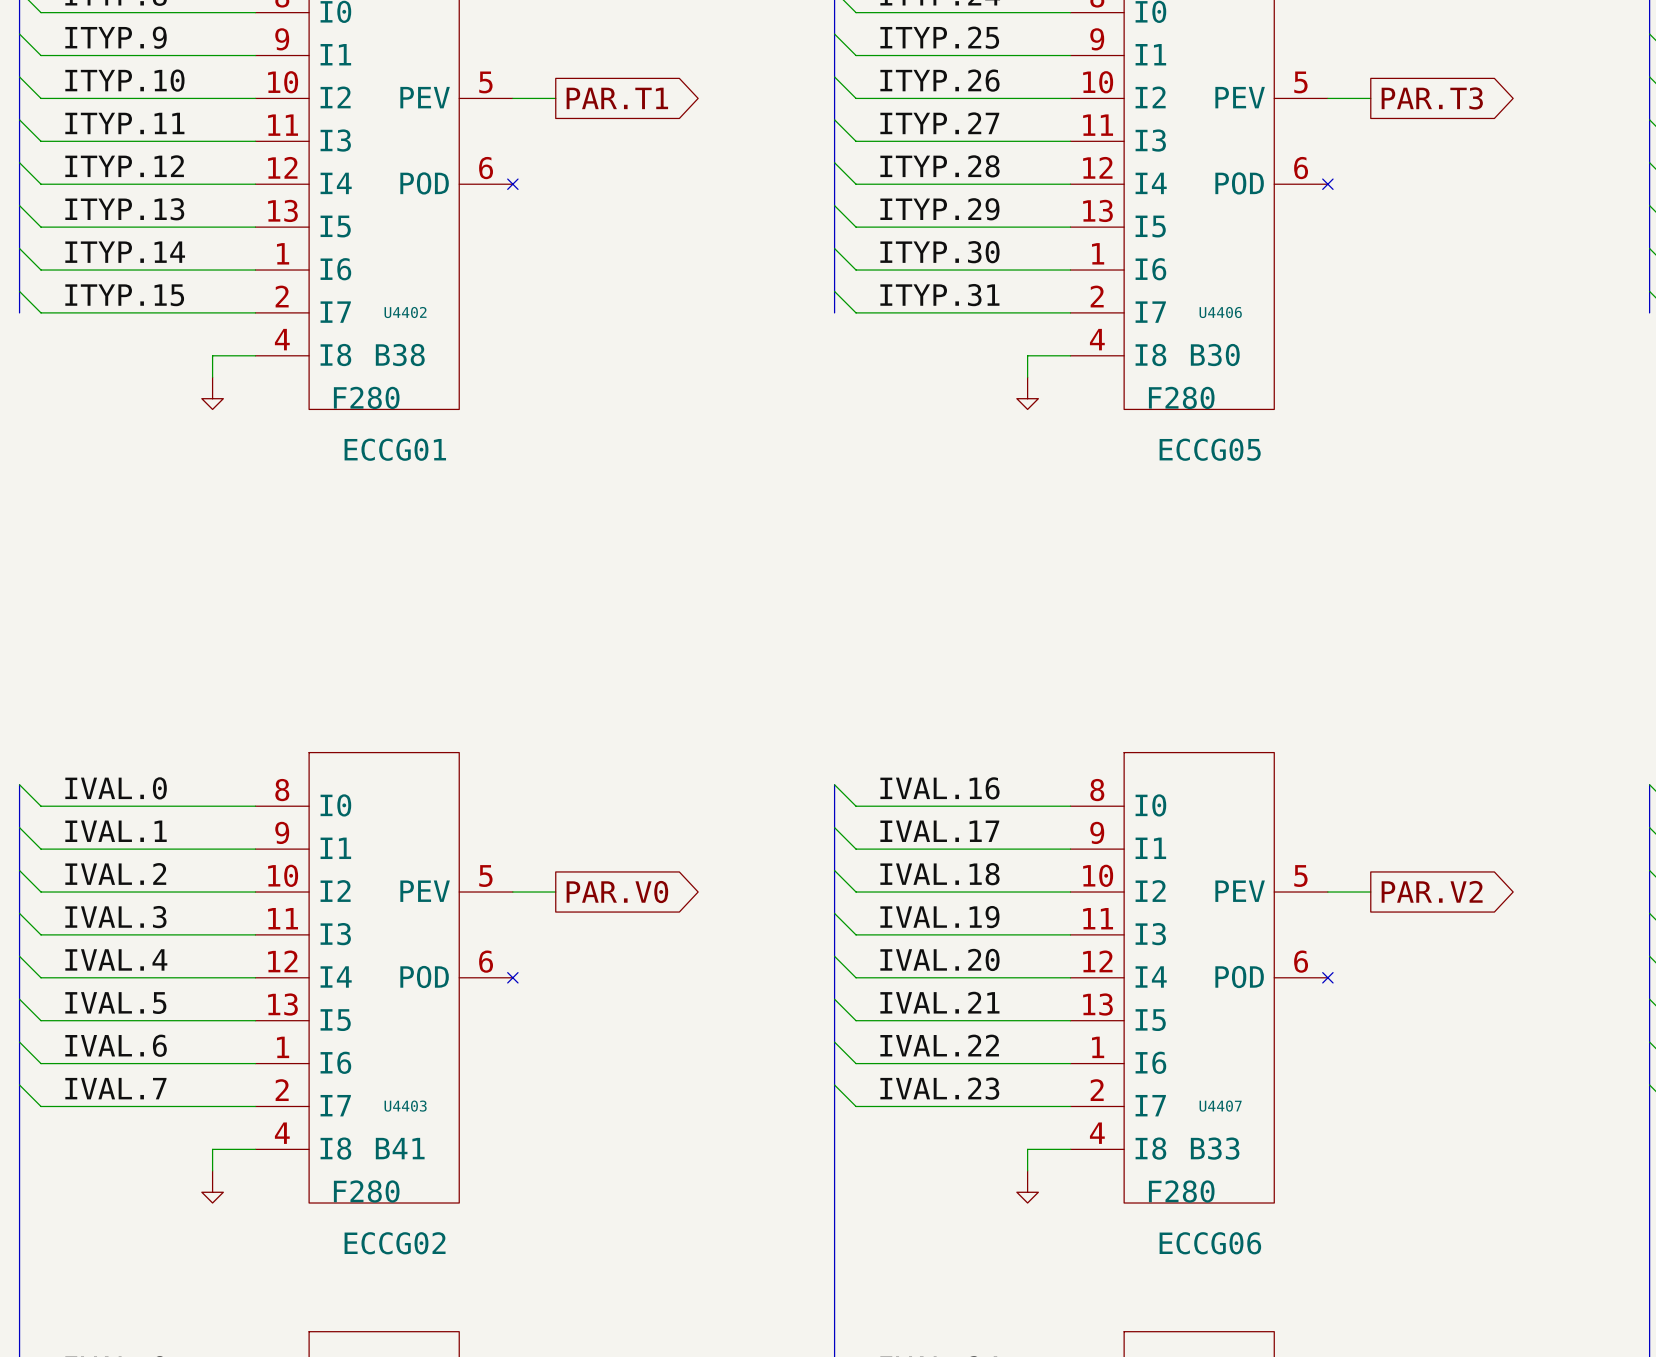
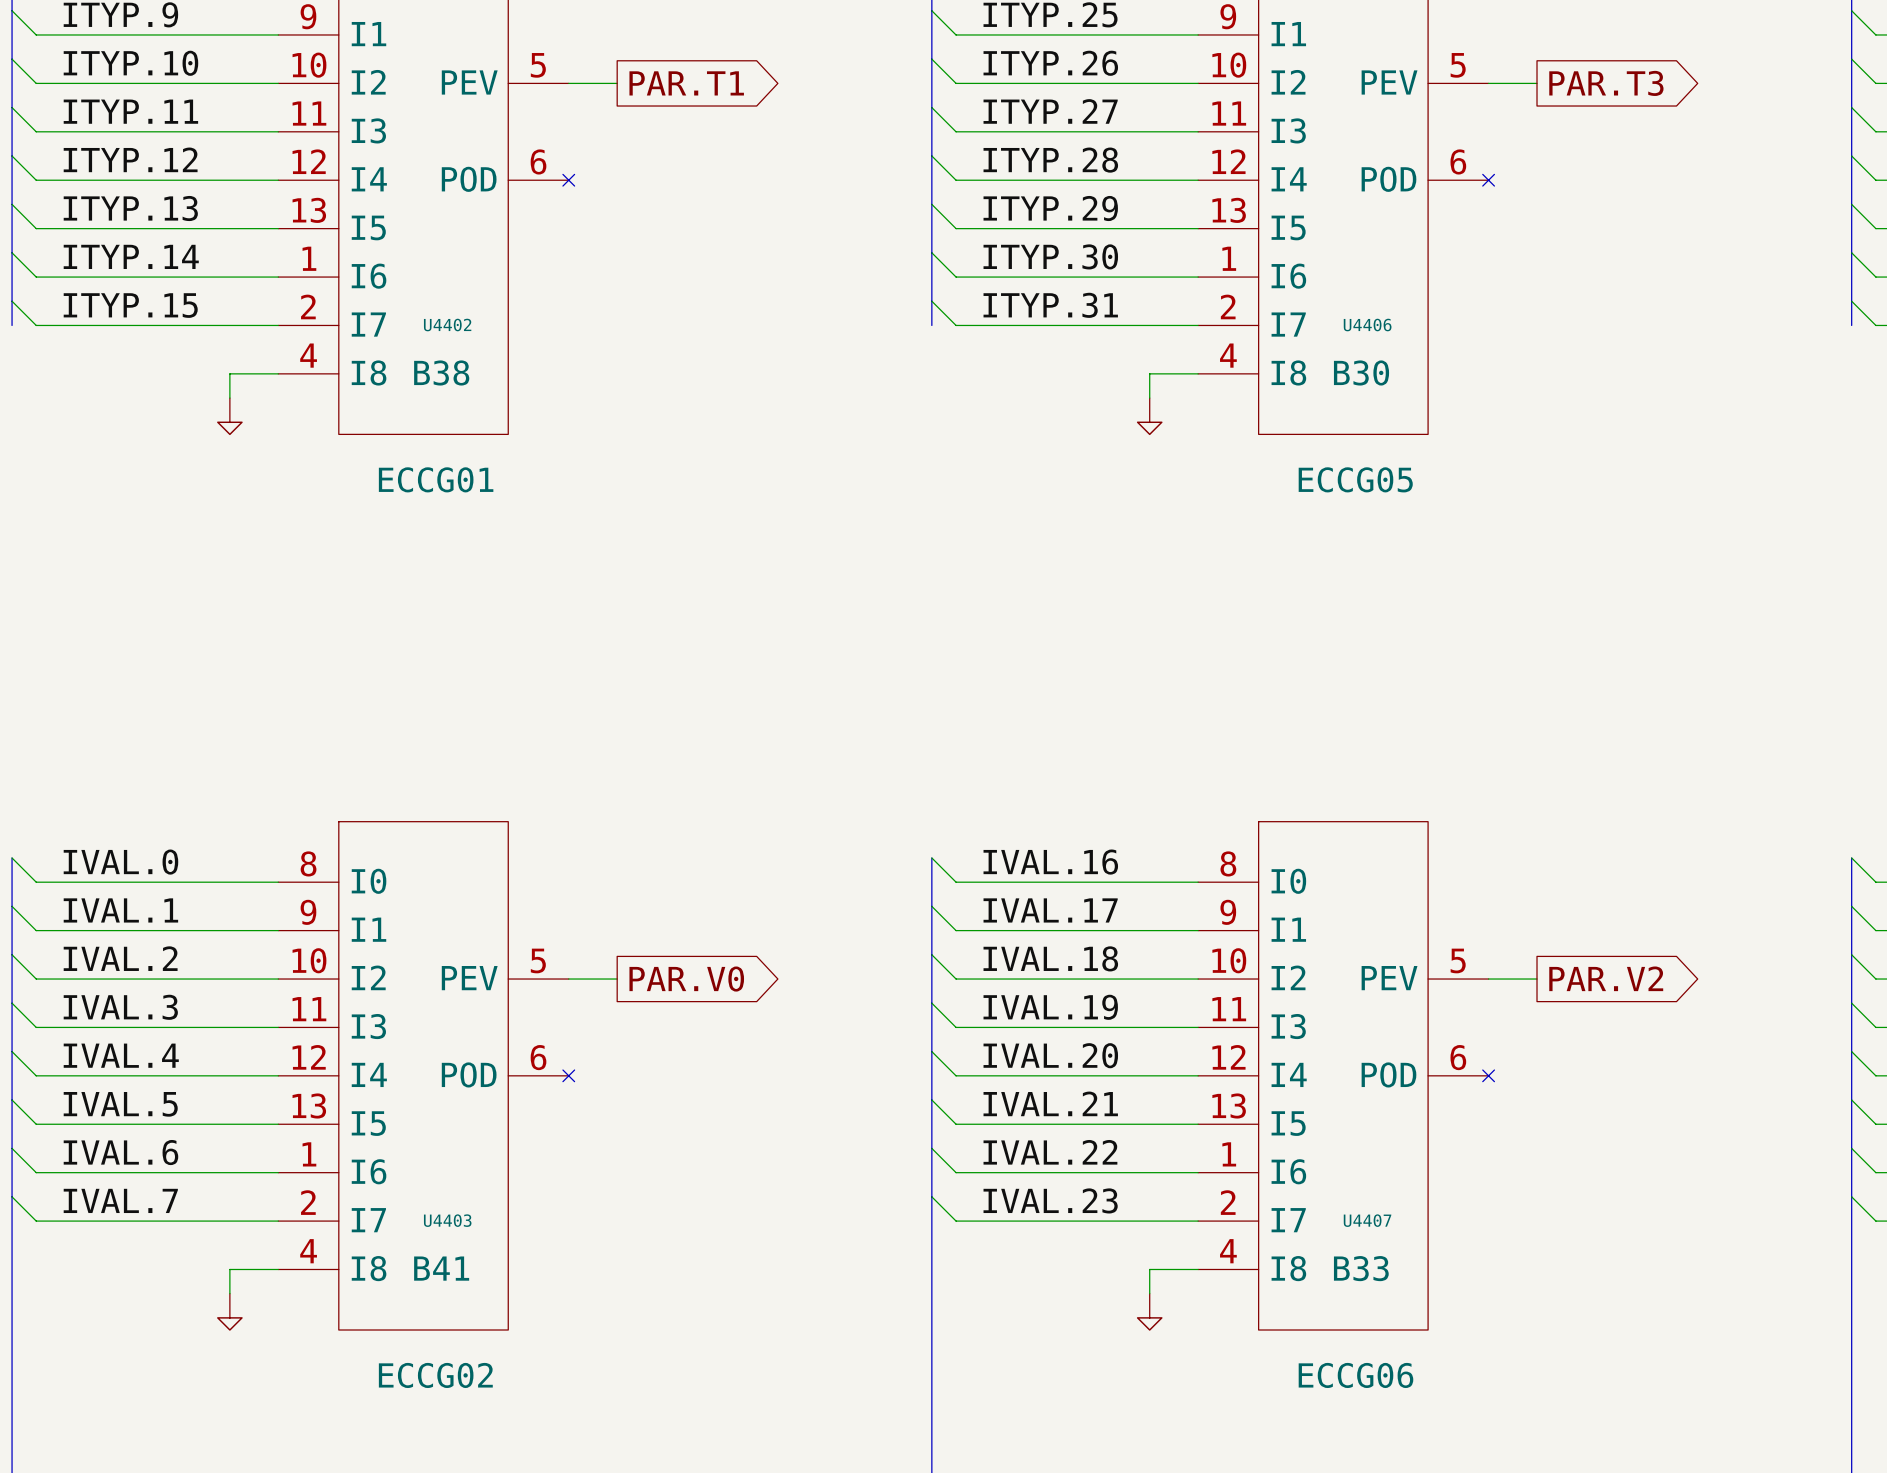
U4402 value: F280 (366, 397) -> none
U4406 value: F280 (1181, 397) -> none
U4403 value: F280 (366, 1191) -> none
U4407 value: F280 (1181, 1191) -> none

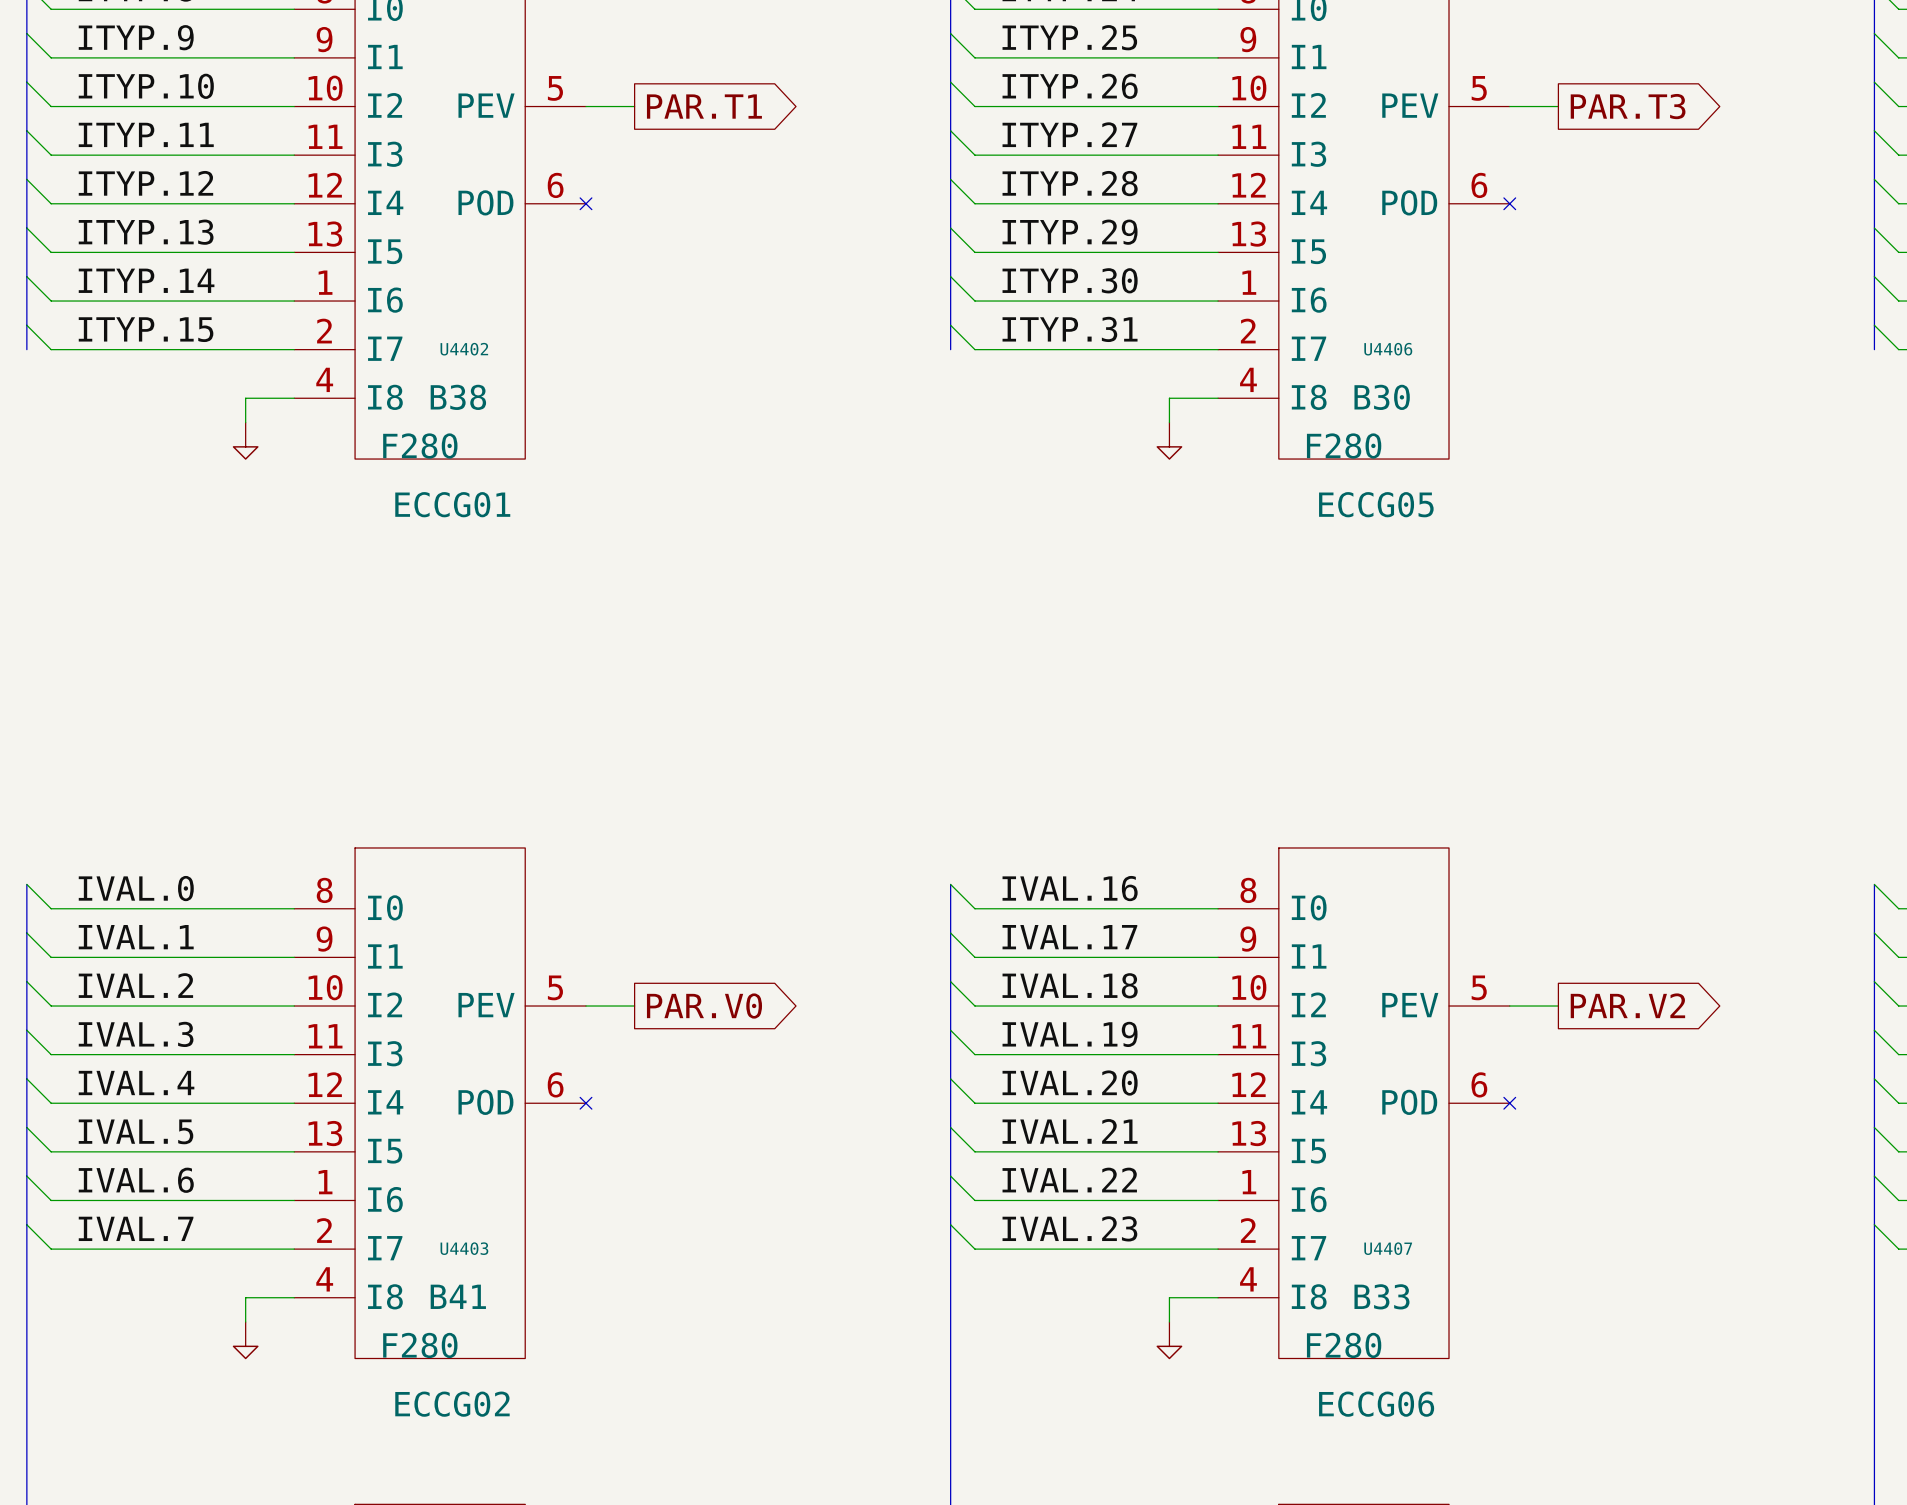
U4402 value: none -> F280 (420, 445)
U4406 value: none -> F280 (1344, 445)
U4403 value: none -> F280 (420, 1345)
U4407 value: none -> F280 (1344, 1345)

